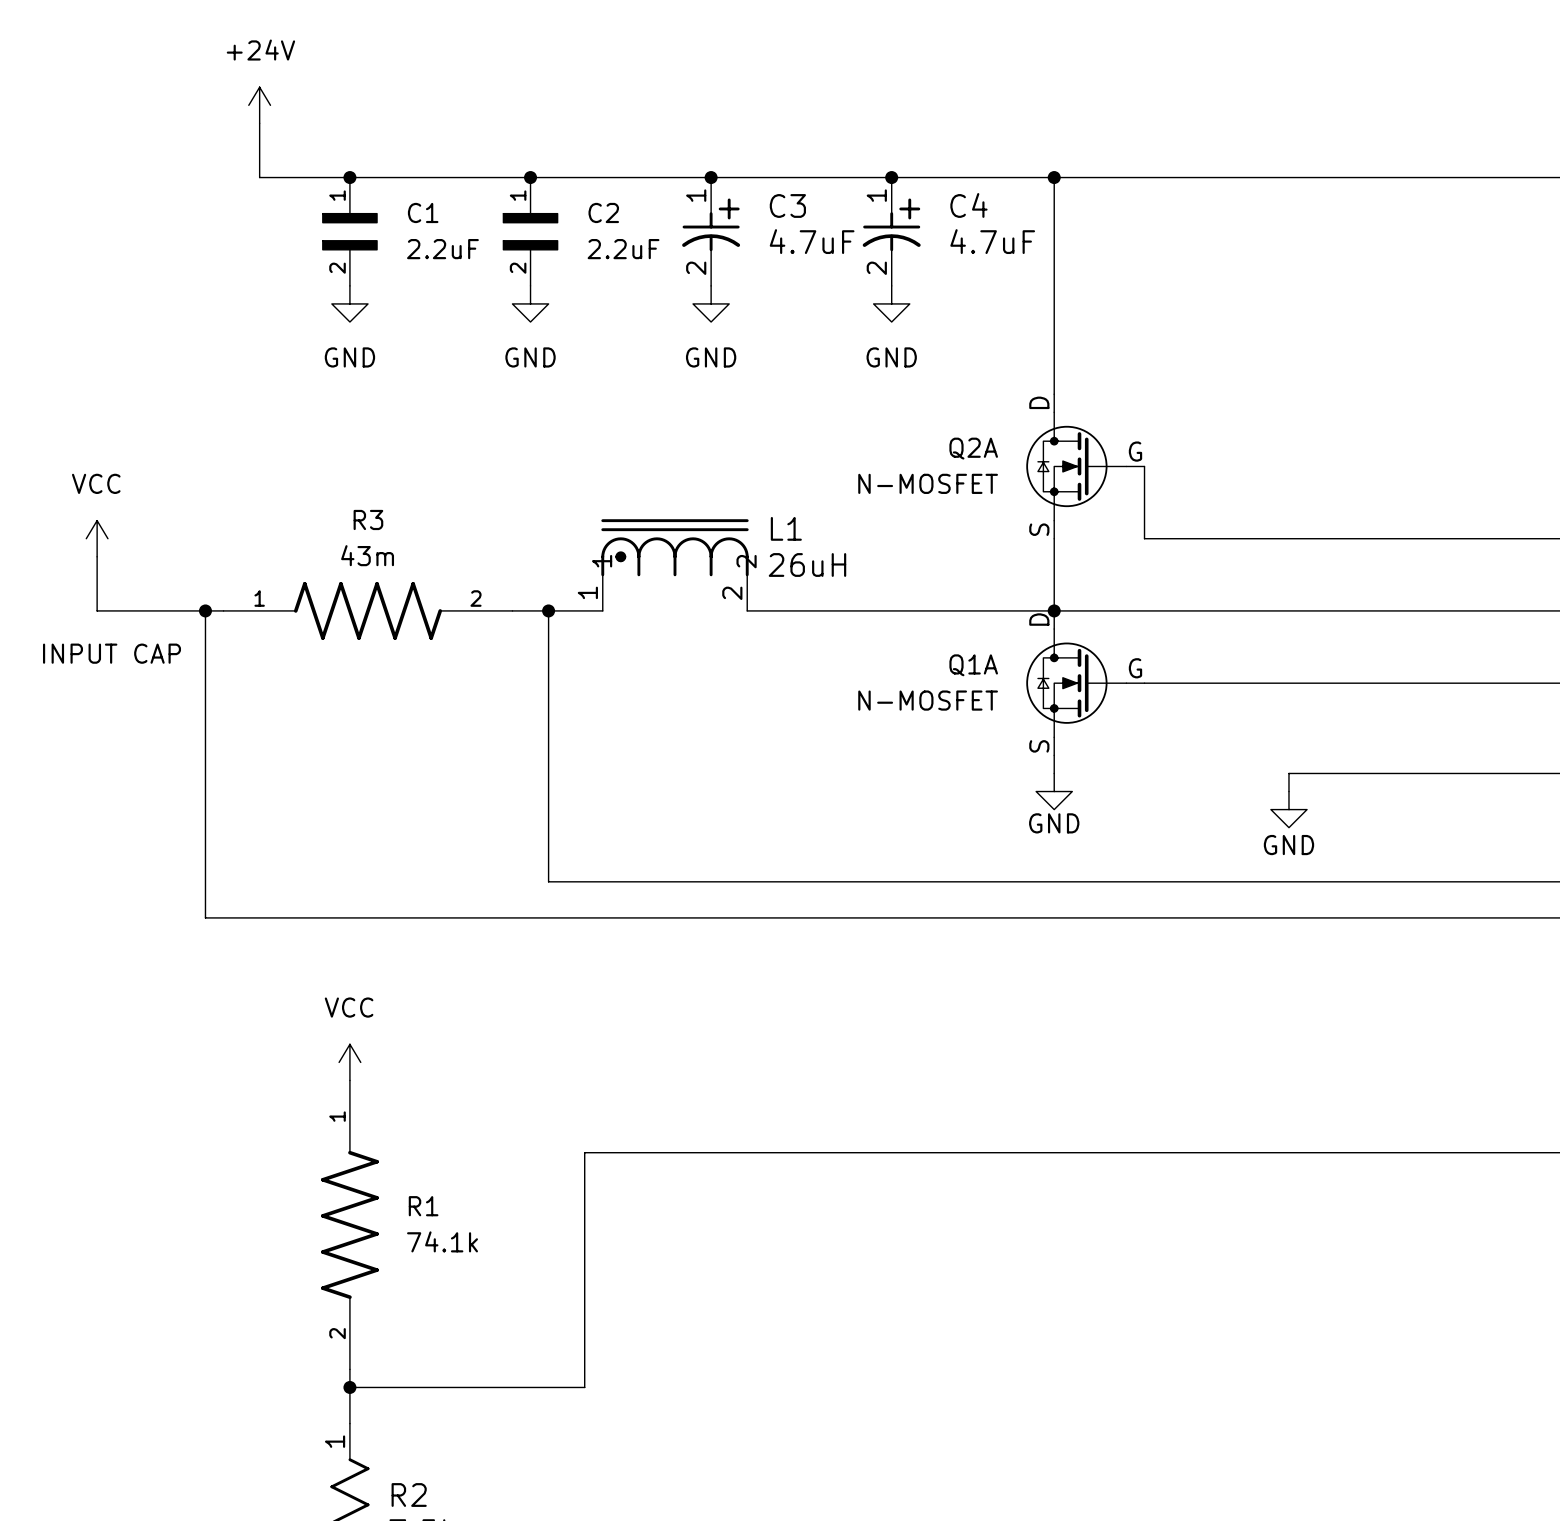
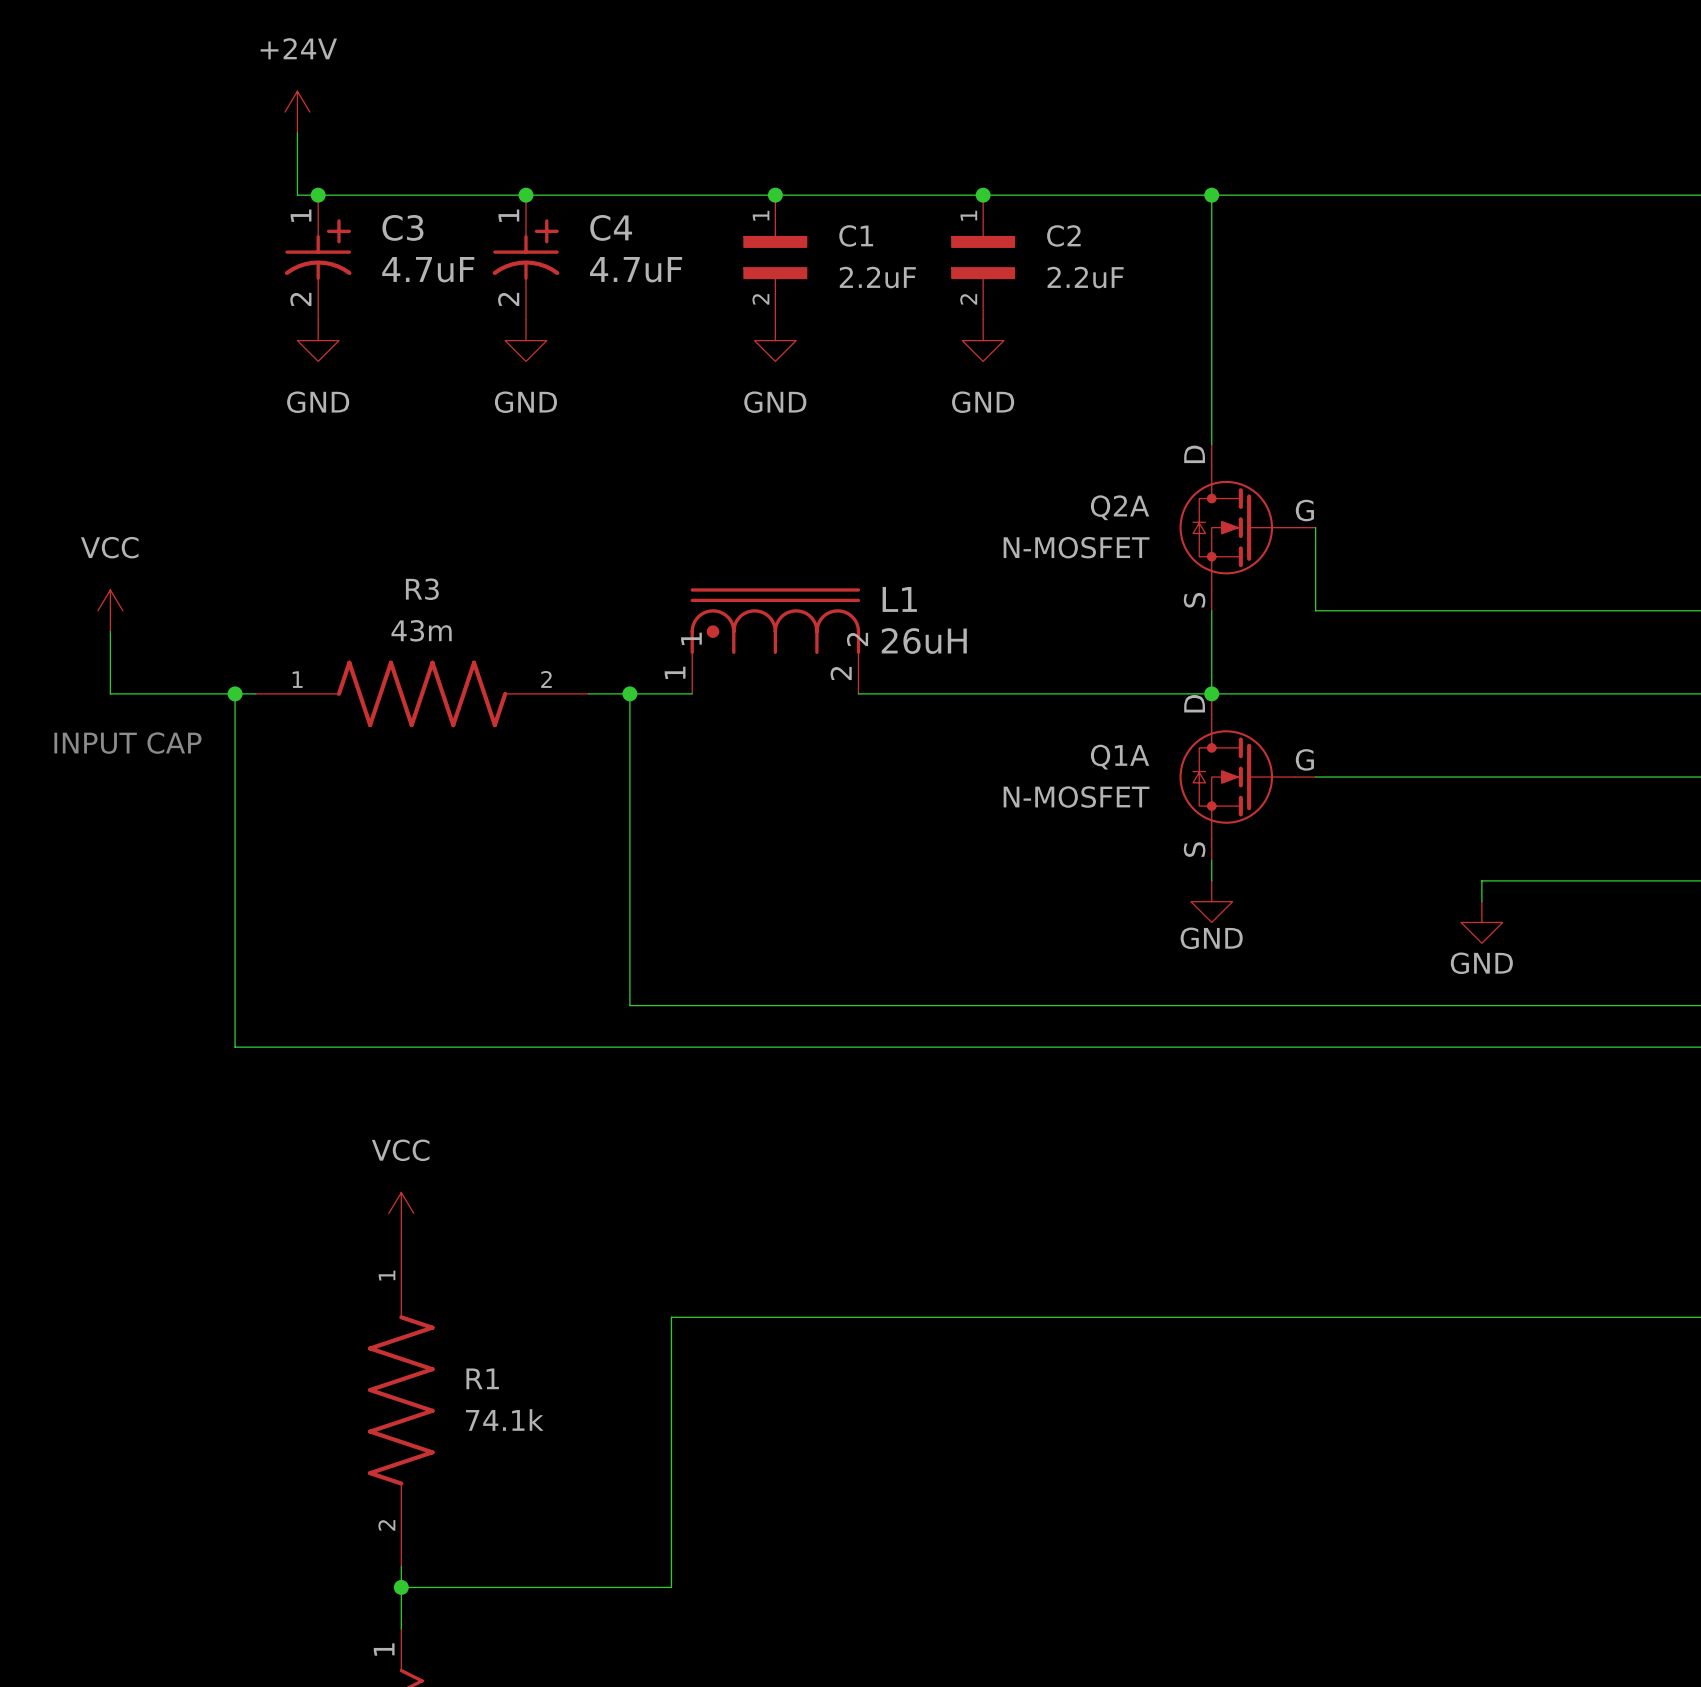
junction: none -> (318, 195)
junction: (349, 177) -> none
junction: none -> (525, 195)
junction: (530, 177) -> none
junction position: (711, 177) -> (775, 195)
junction position: (891, 177) -> (983, 195)
C1 position: (349, 231) -> (775, 257)
C2 position: (530, 231) -> (983, 257)
C3 position: (711, 231) -> (318, 257)
C4 position: (891, 231) -> (525, 257)
power symbol: none -> GND (318, 340)
power symbol: GND (349, 303) -> none
power symbol: none -> GND (525, 340)
power symbol: GND (530, 303) -> none
power symbol position: GND (711, 303) -> GND (775, 340)
power symbol position: GND (891, 303) -> GND (983, 340)

